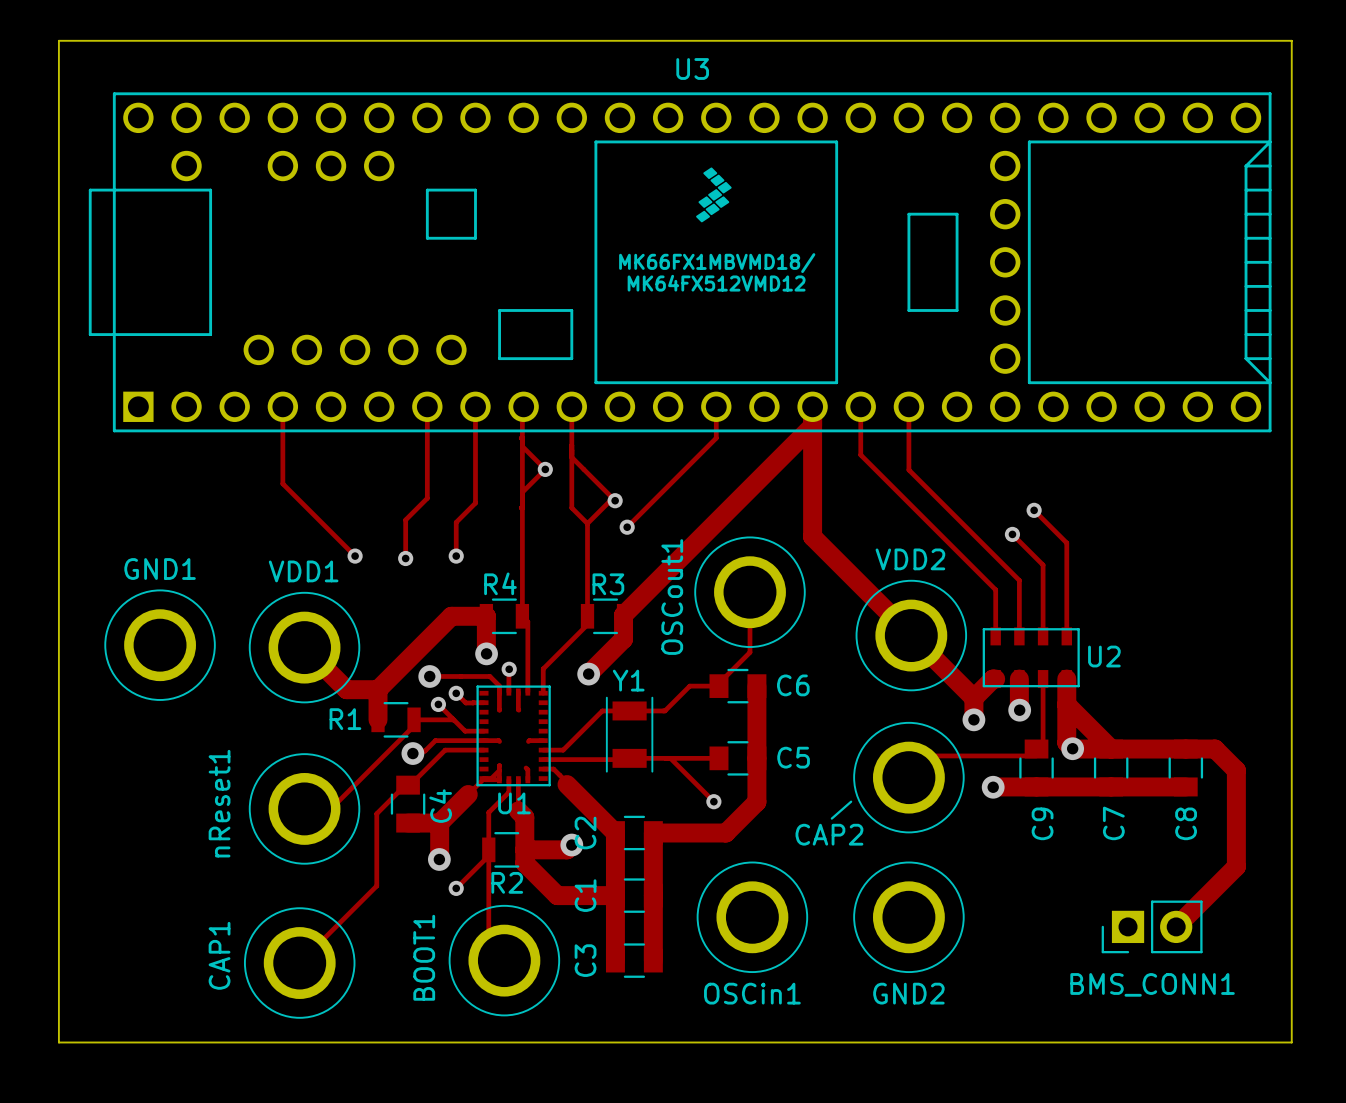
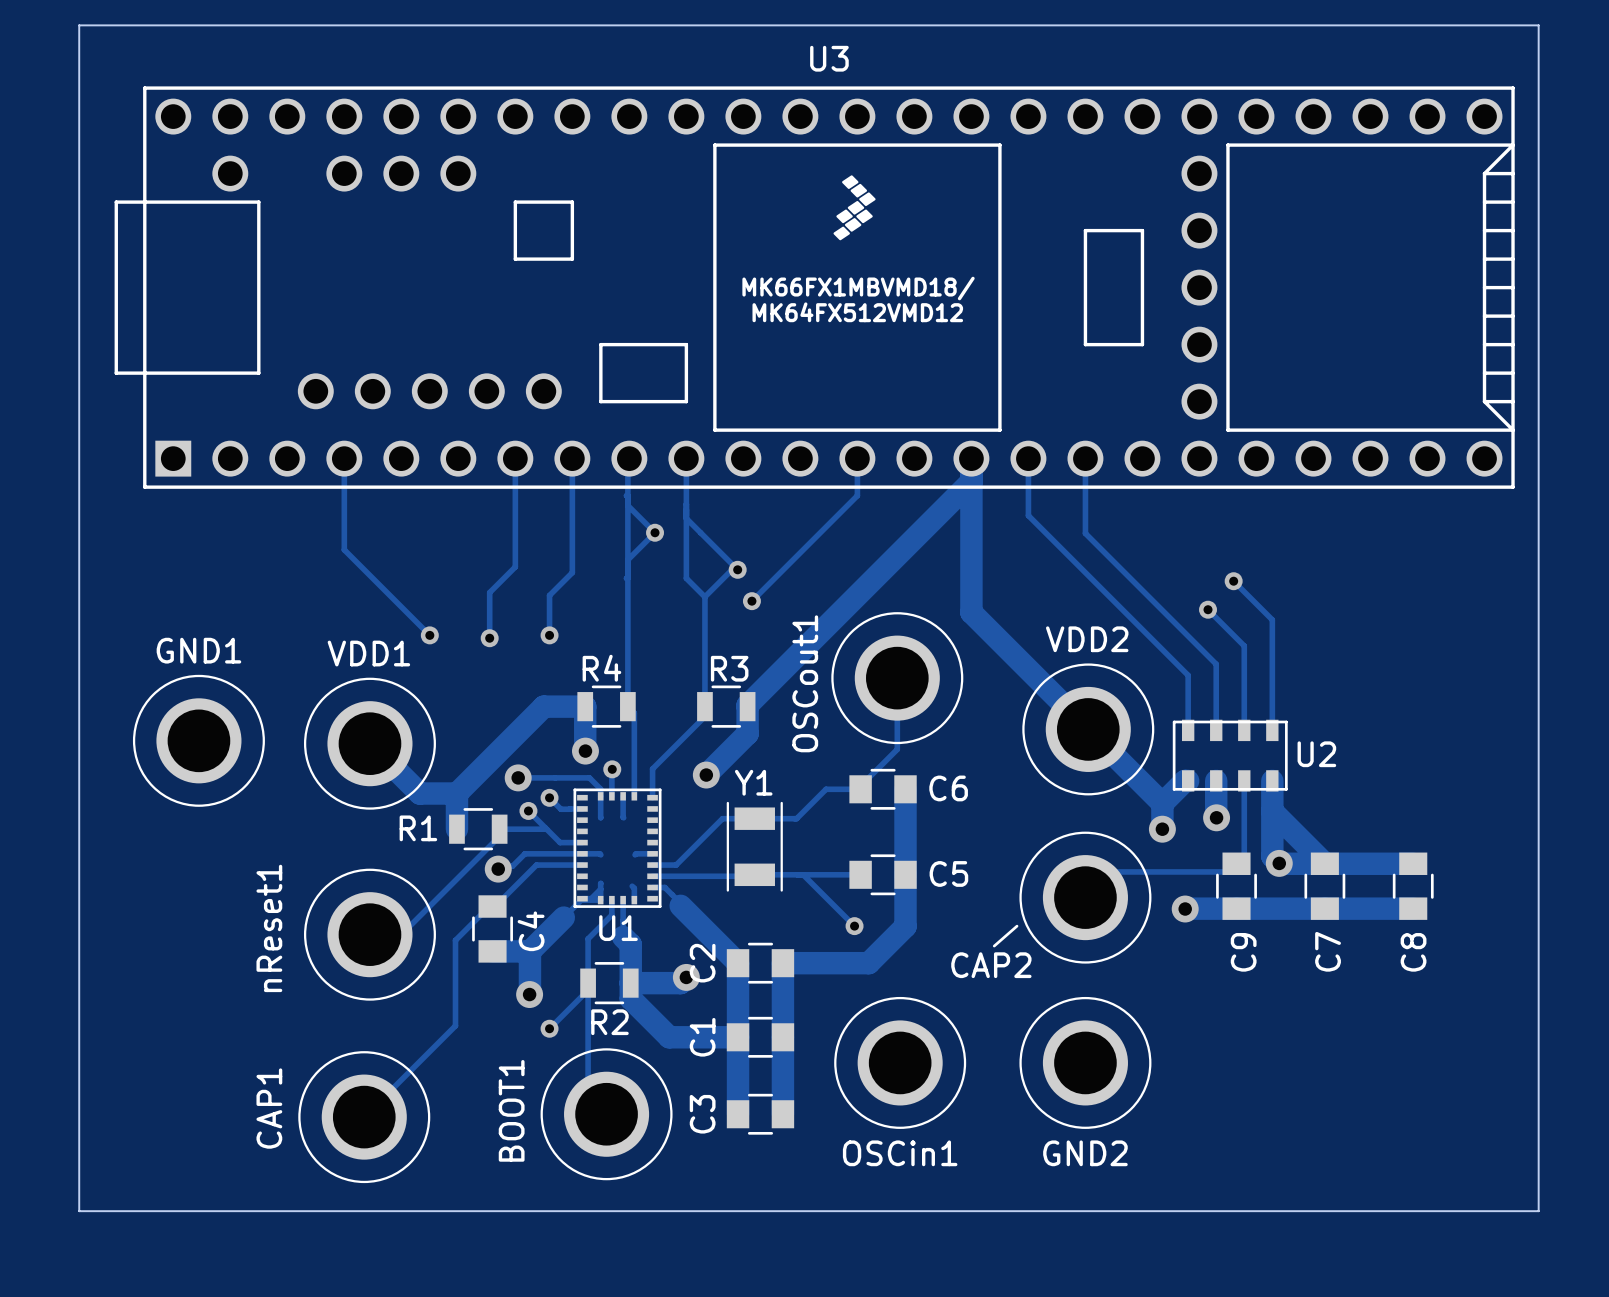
track: (1185, 749) (1215, 749) (1236, 770) (1236, 866) (1176, 926) -> none
BMS_CONN1: (1152, 926) -> none

